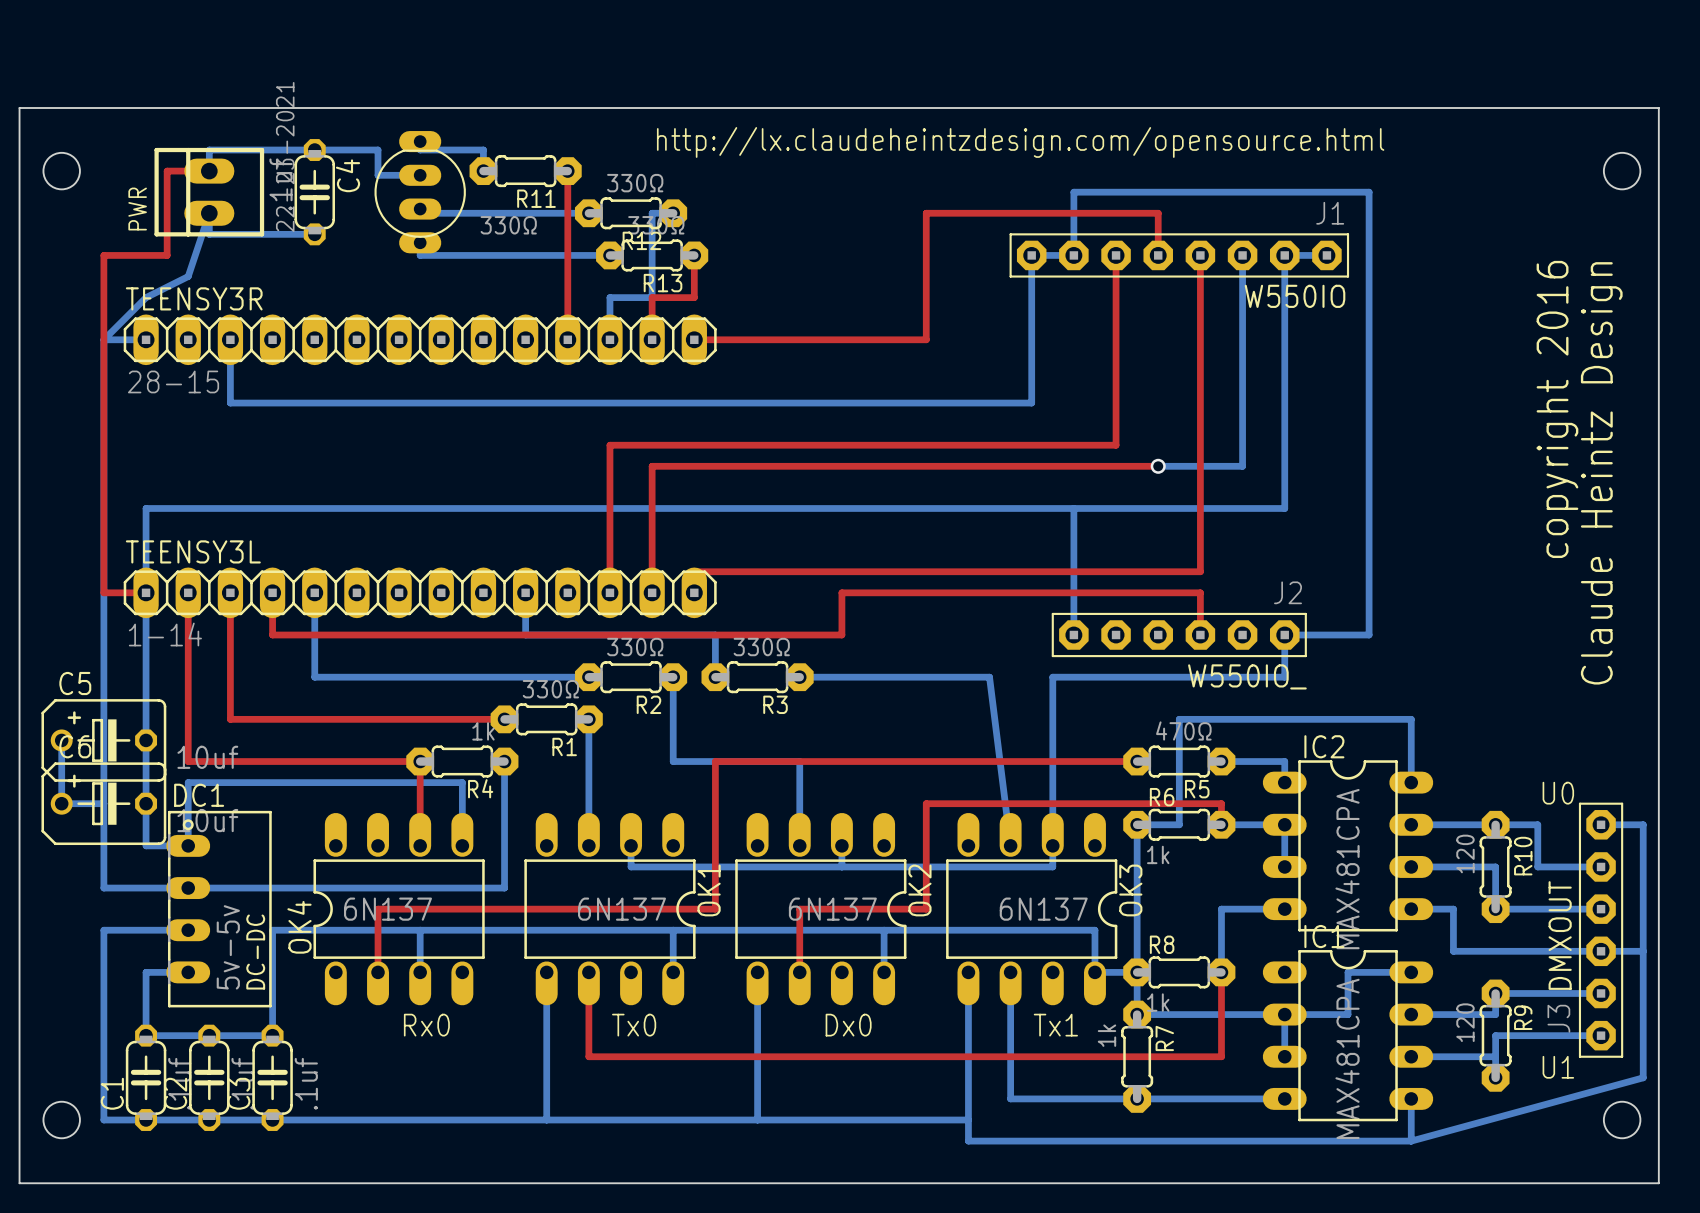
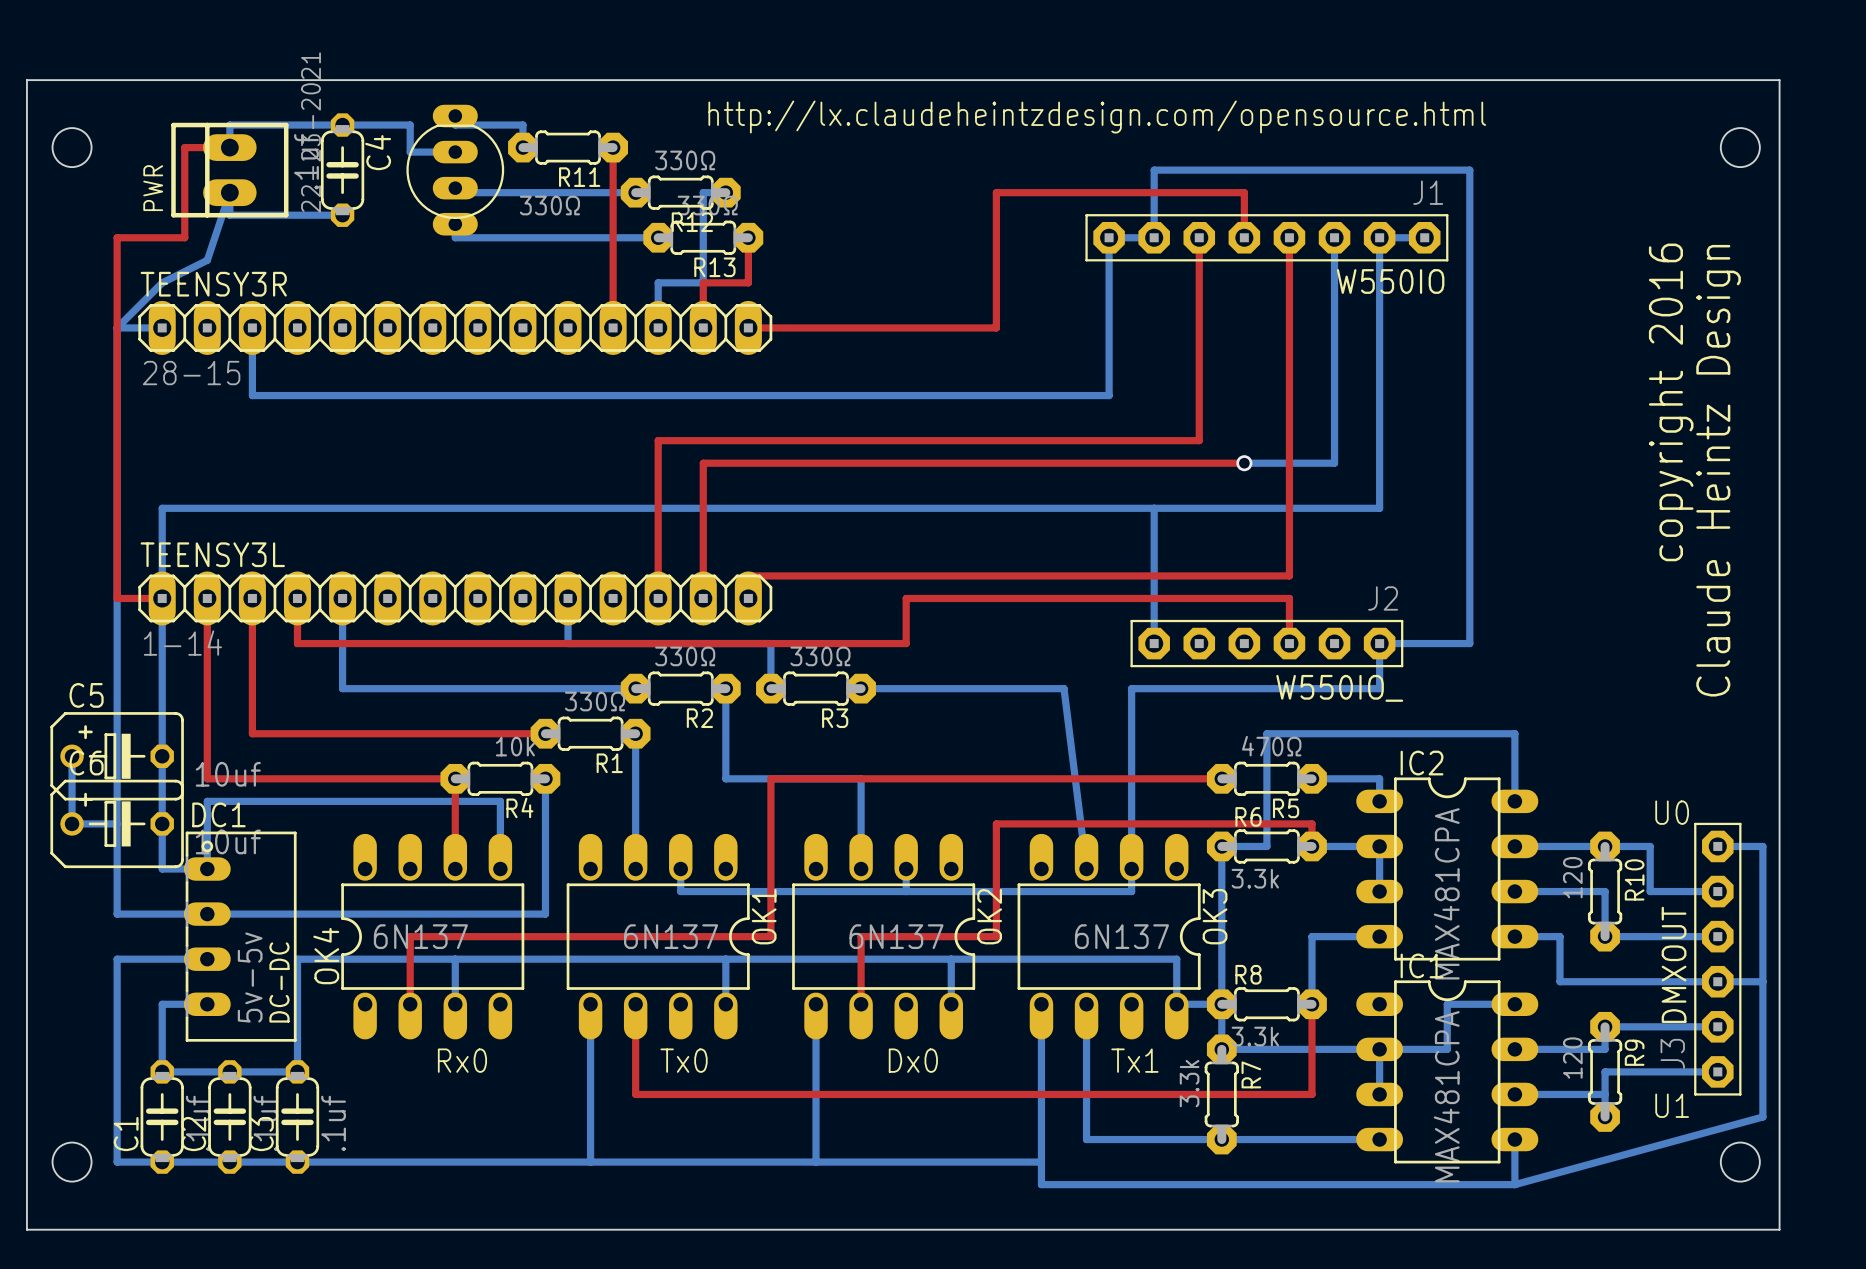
R4 value: 1k (483, 731) -> 10k (515, 746)
R6 value: 1k (1158, 854) -> 3.3k (1255, 878)
R8 value: 1k (1158, 1002) -> 3.3k (1255, 1036)
R7 value: 1k (1106, 1035) -> 3.3k (1189, 1083)

